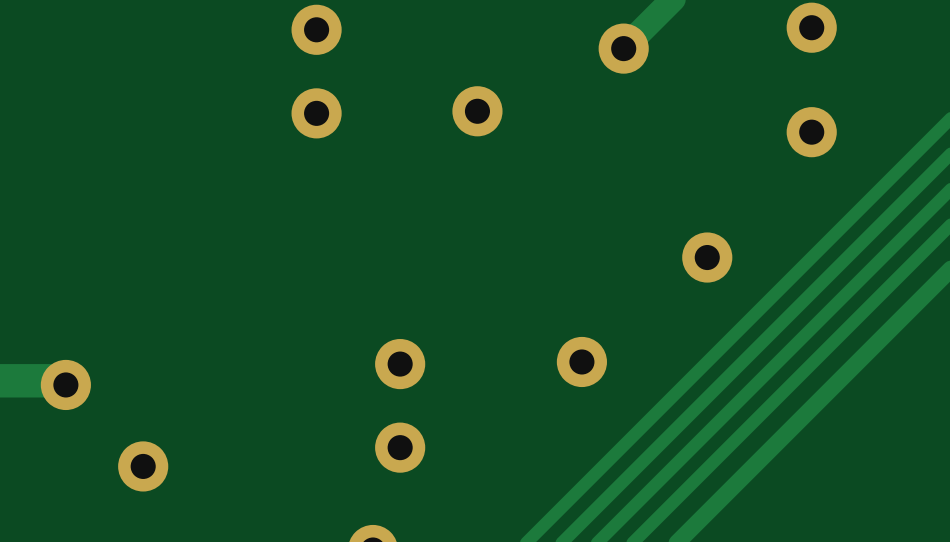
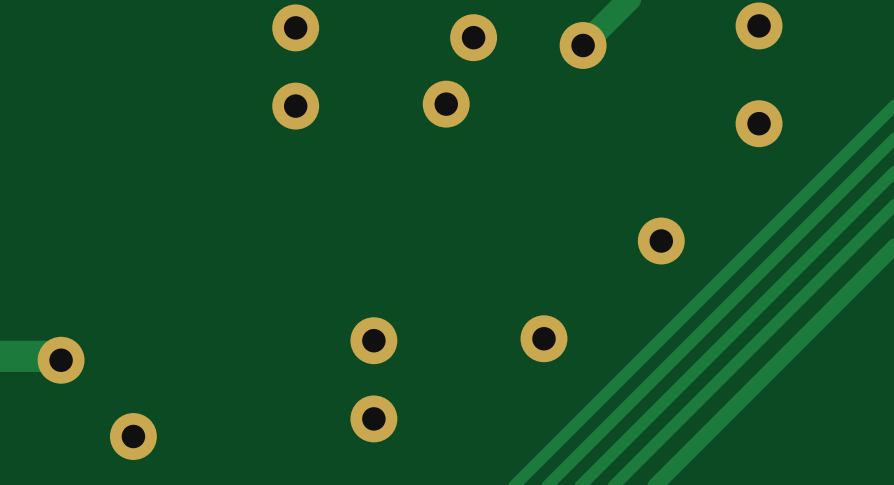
via: none -> (473, 37)

